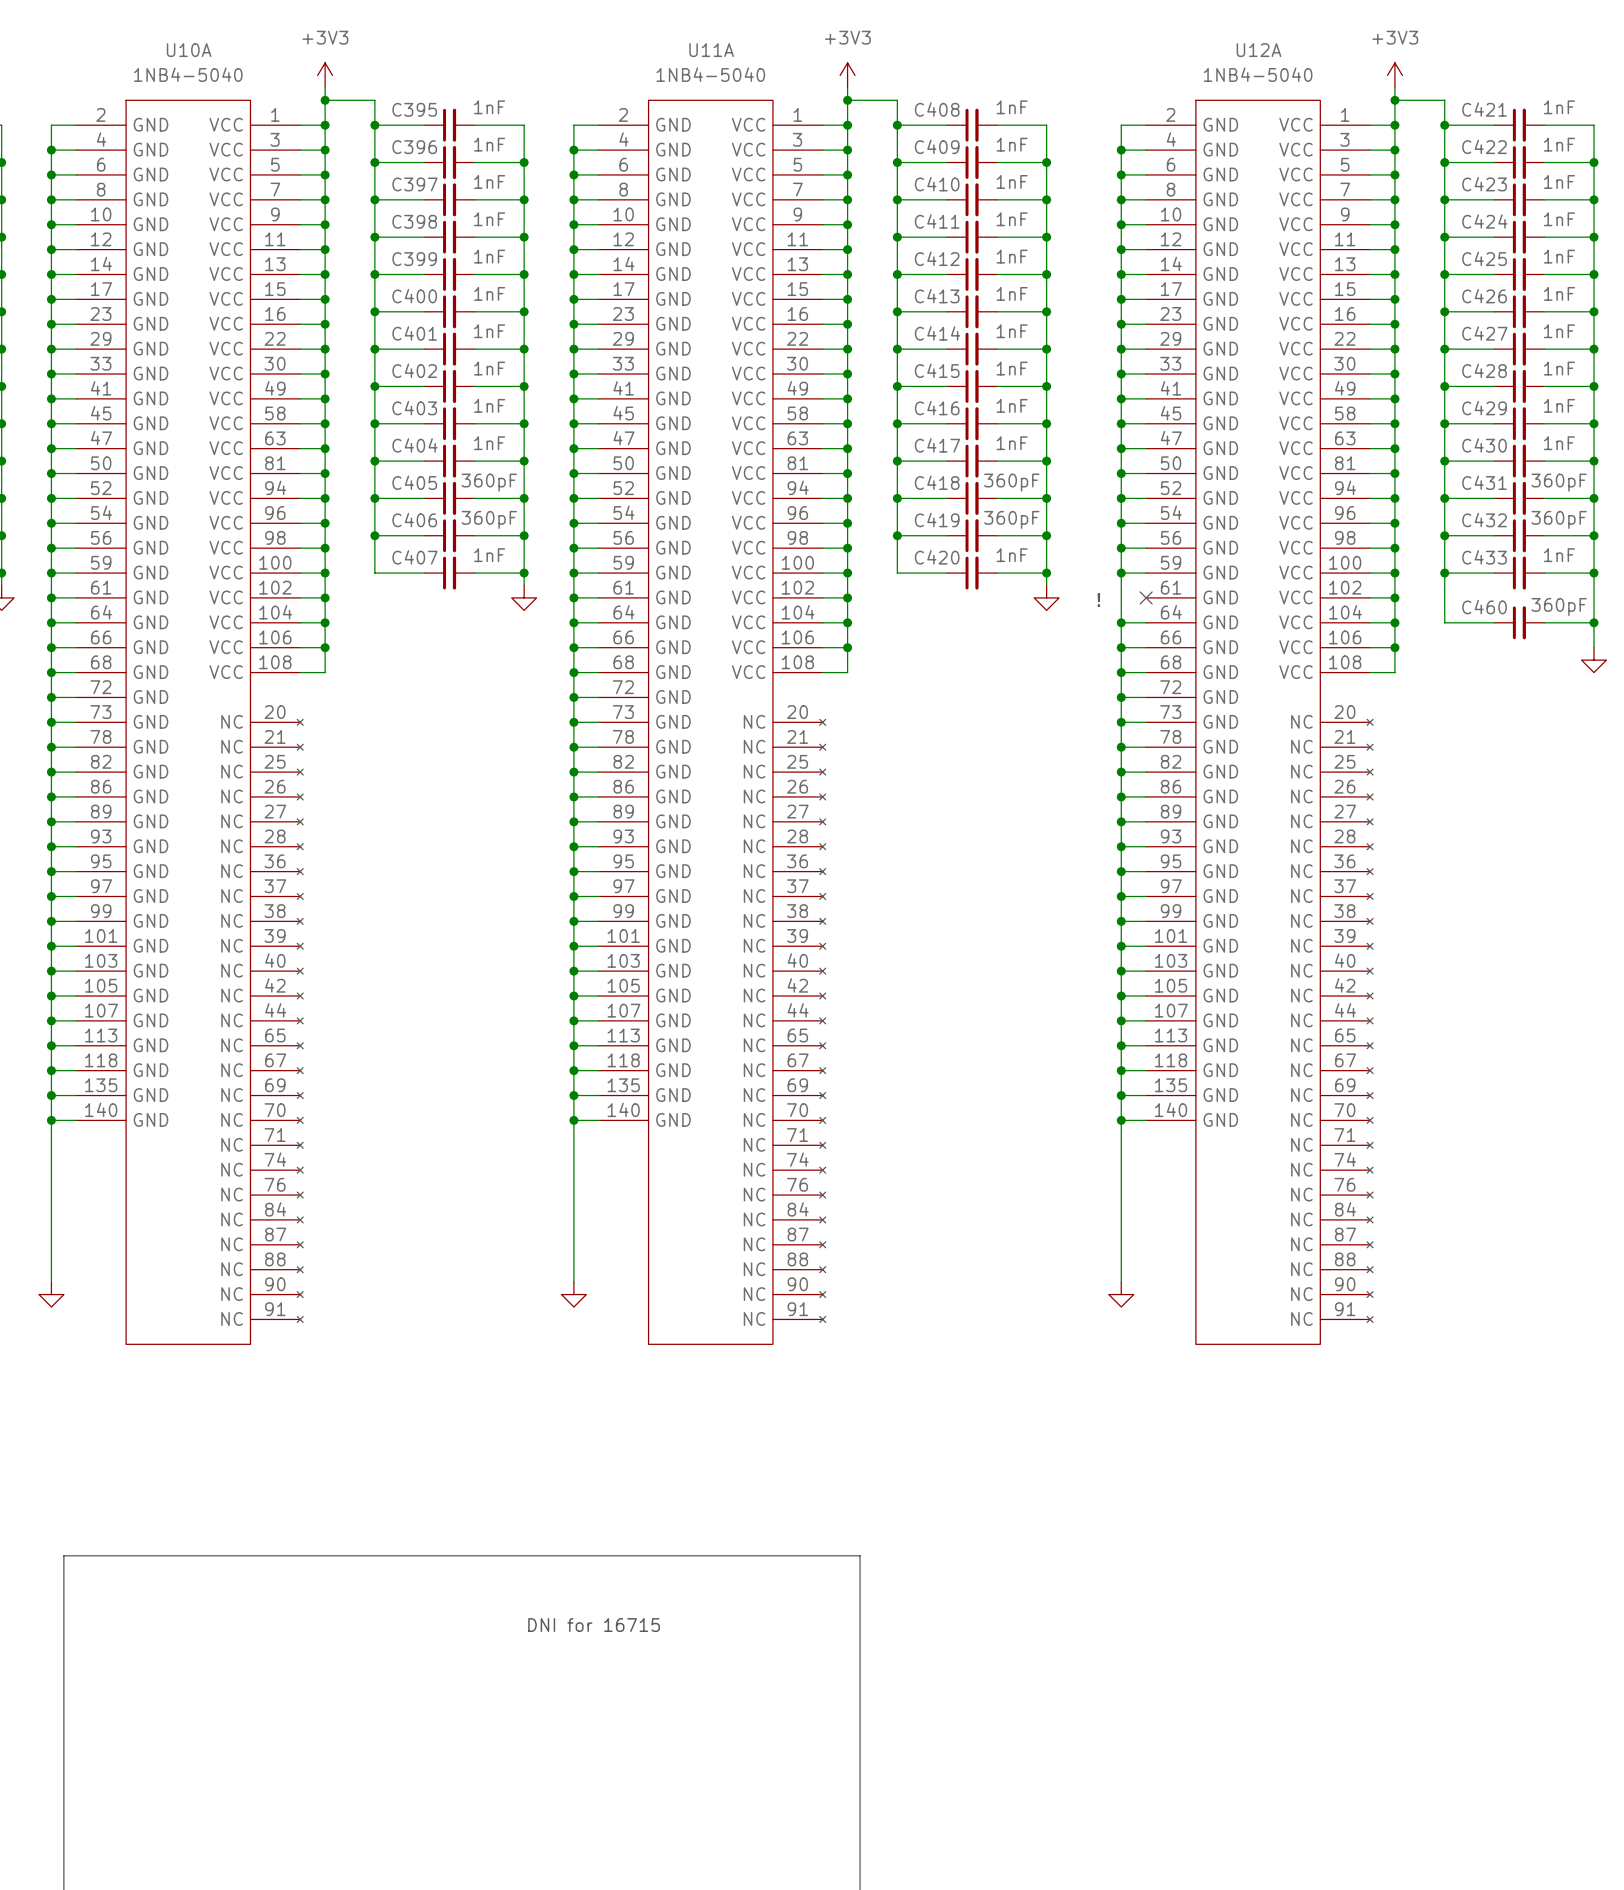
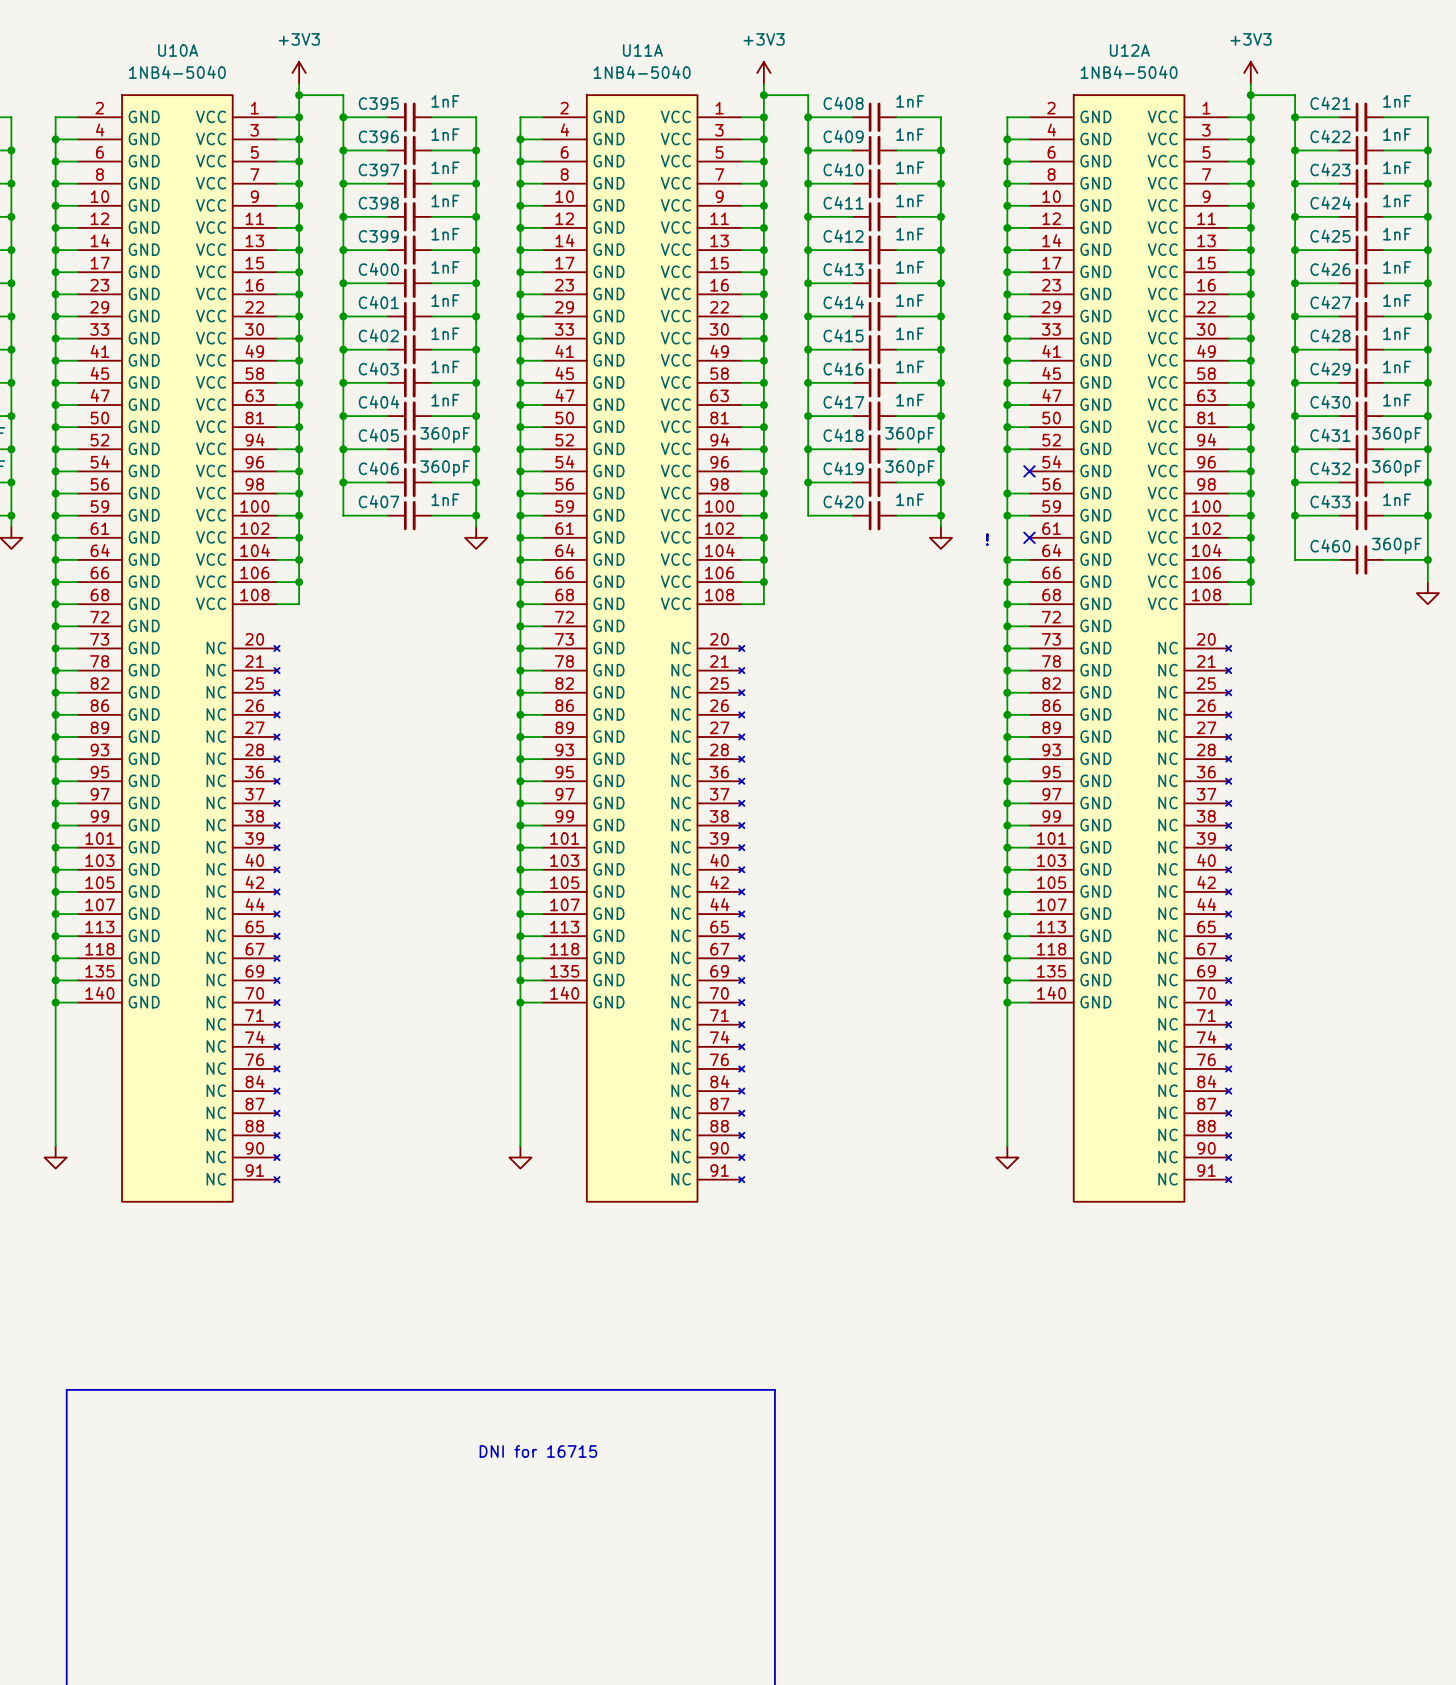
wire: (1121, 523) (1146, 523) -> none
junction: (1121, 523) -> none
no-connect mark: none -> (1029, 471)

